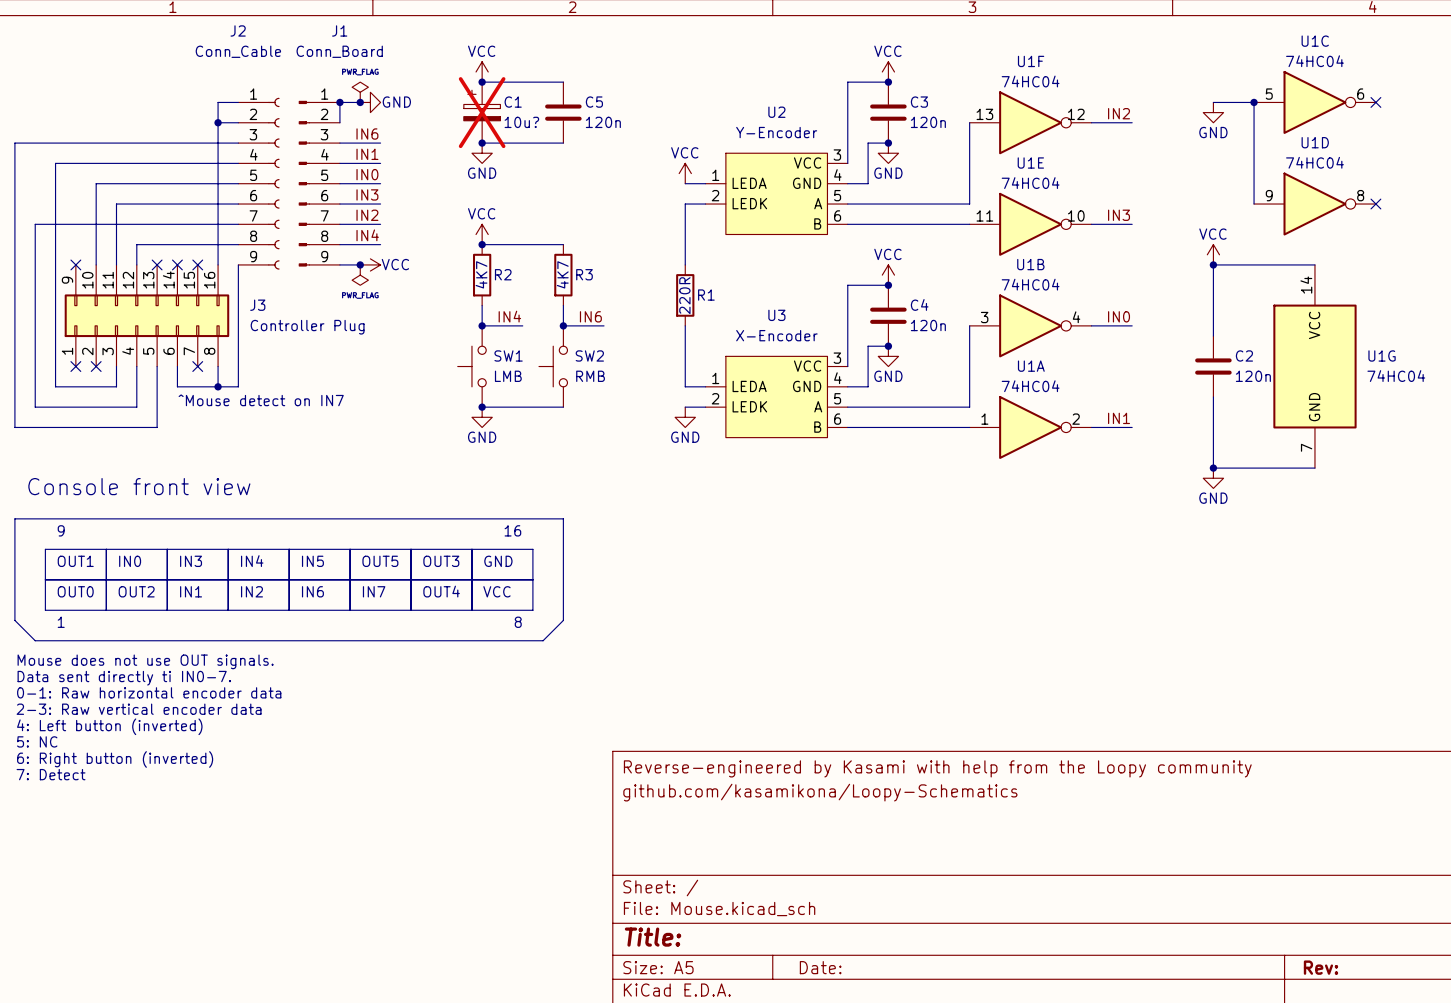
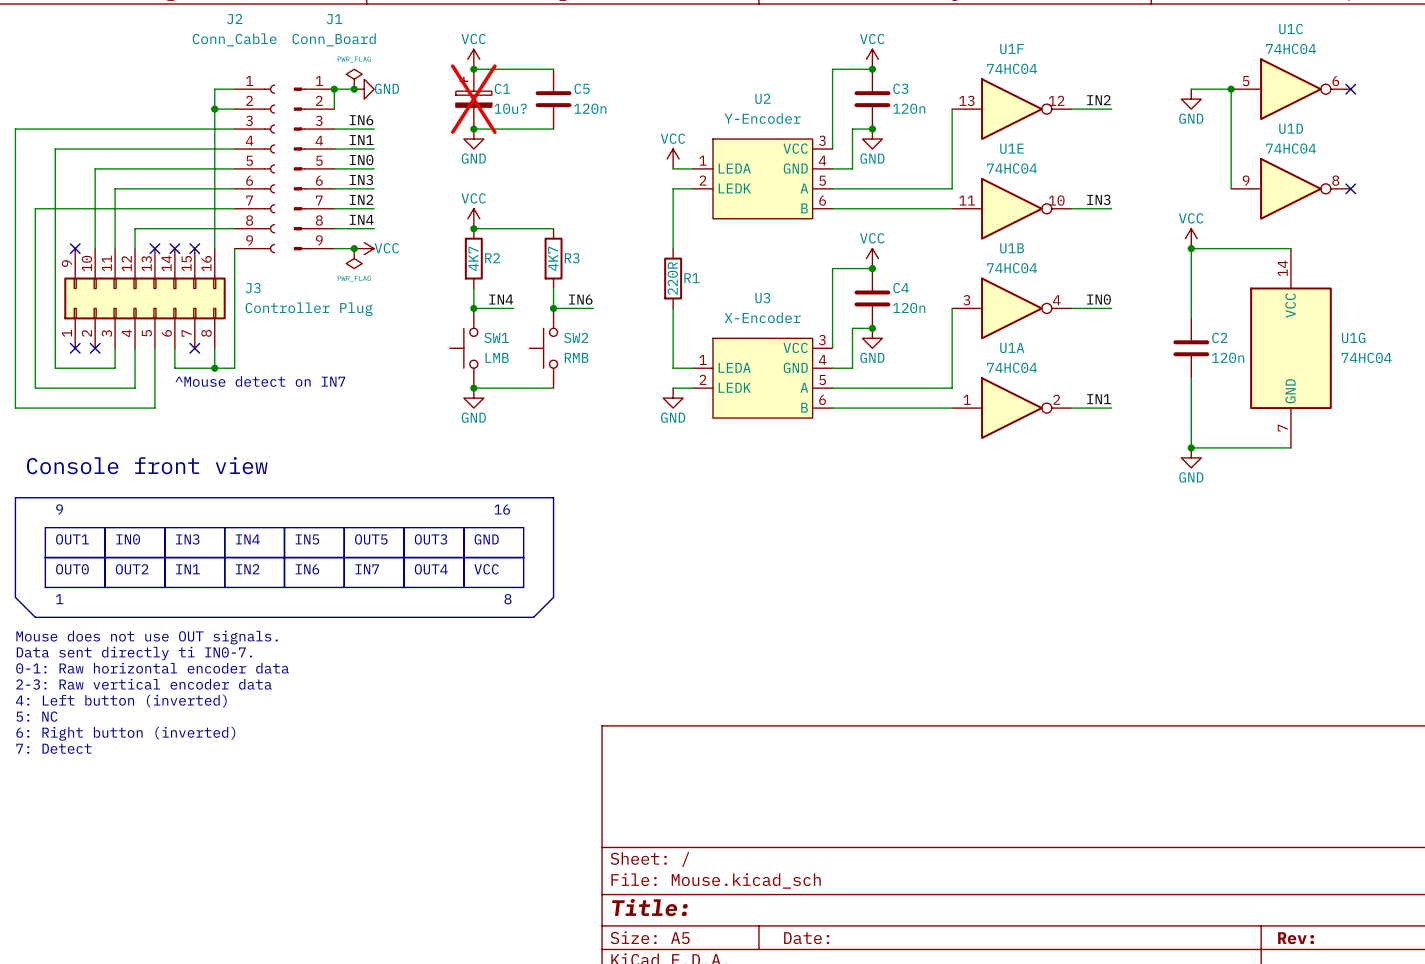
title block: Reverse-engineered by Kasami with help from the Loopy community (937, 768) -> none
title block: github.com/kasamikona/Loopy-Schematics (820, 792) -> none

